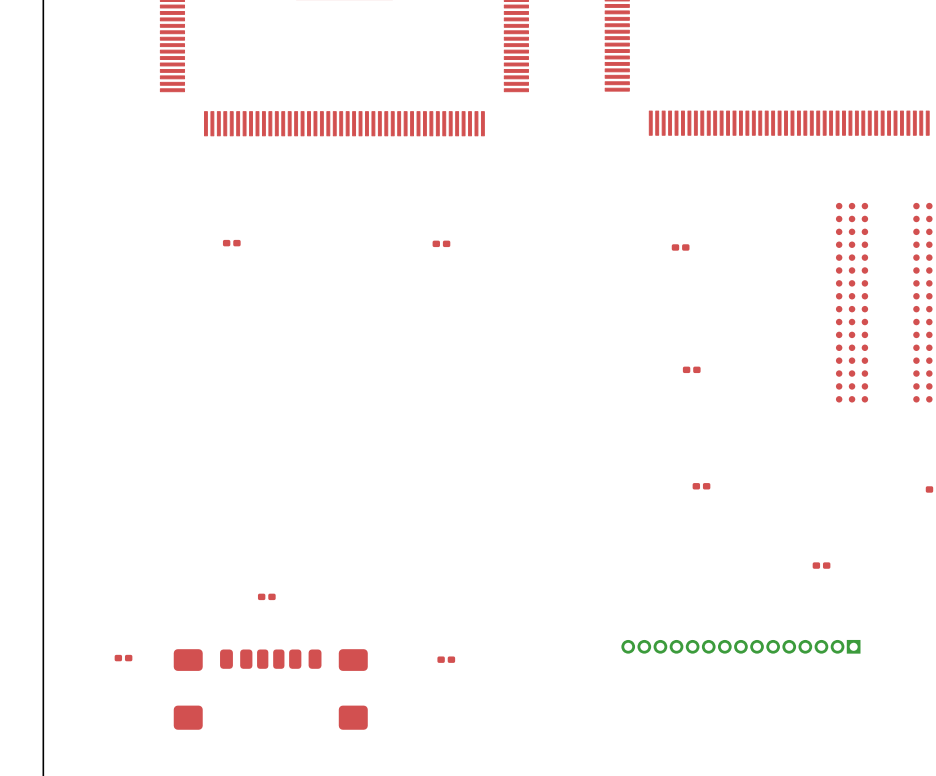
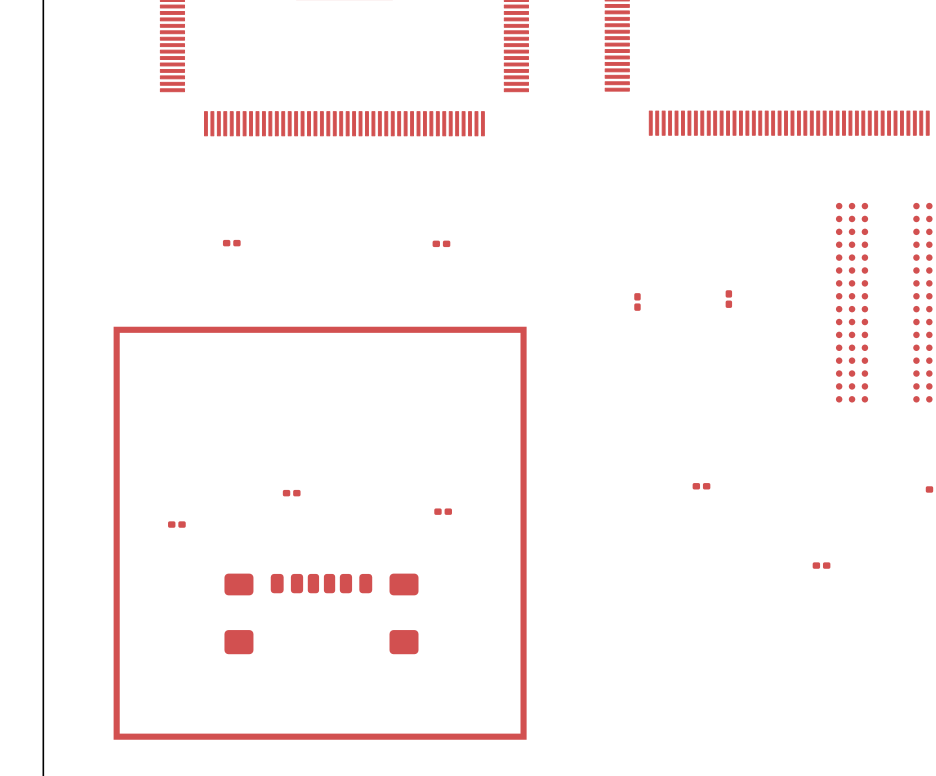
part: (680, 247) -> none
part: none -> (728, 299)
part: none -> (637, 301)
part: (691, 369) -> none
part: none -> (291, 493)
part: none -> (443, 511)
part: none -> (176, 524)
part: none -> (320, 533)
part: (266, 596) -> none
part: (740, 646) -> none
part: (123, 658) -> none
part: (446, 659) -> none
part position: (270, 689) -> (321, 613)

